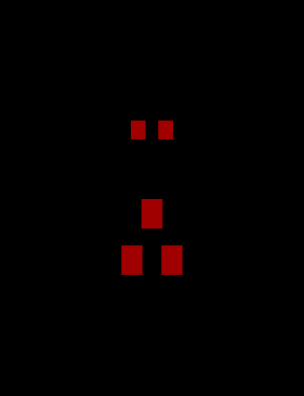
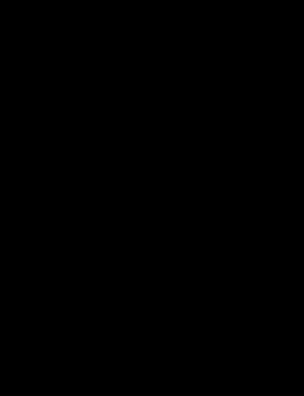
part: (151, 130) -> none
part: (151, 236) -> none

